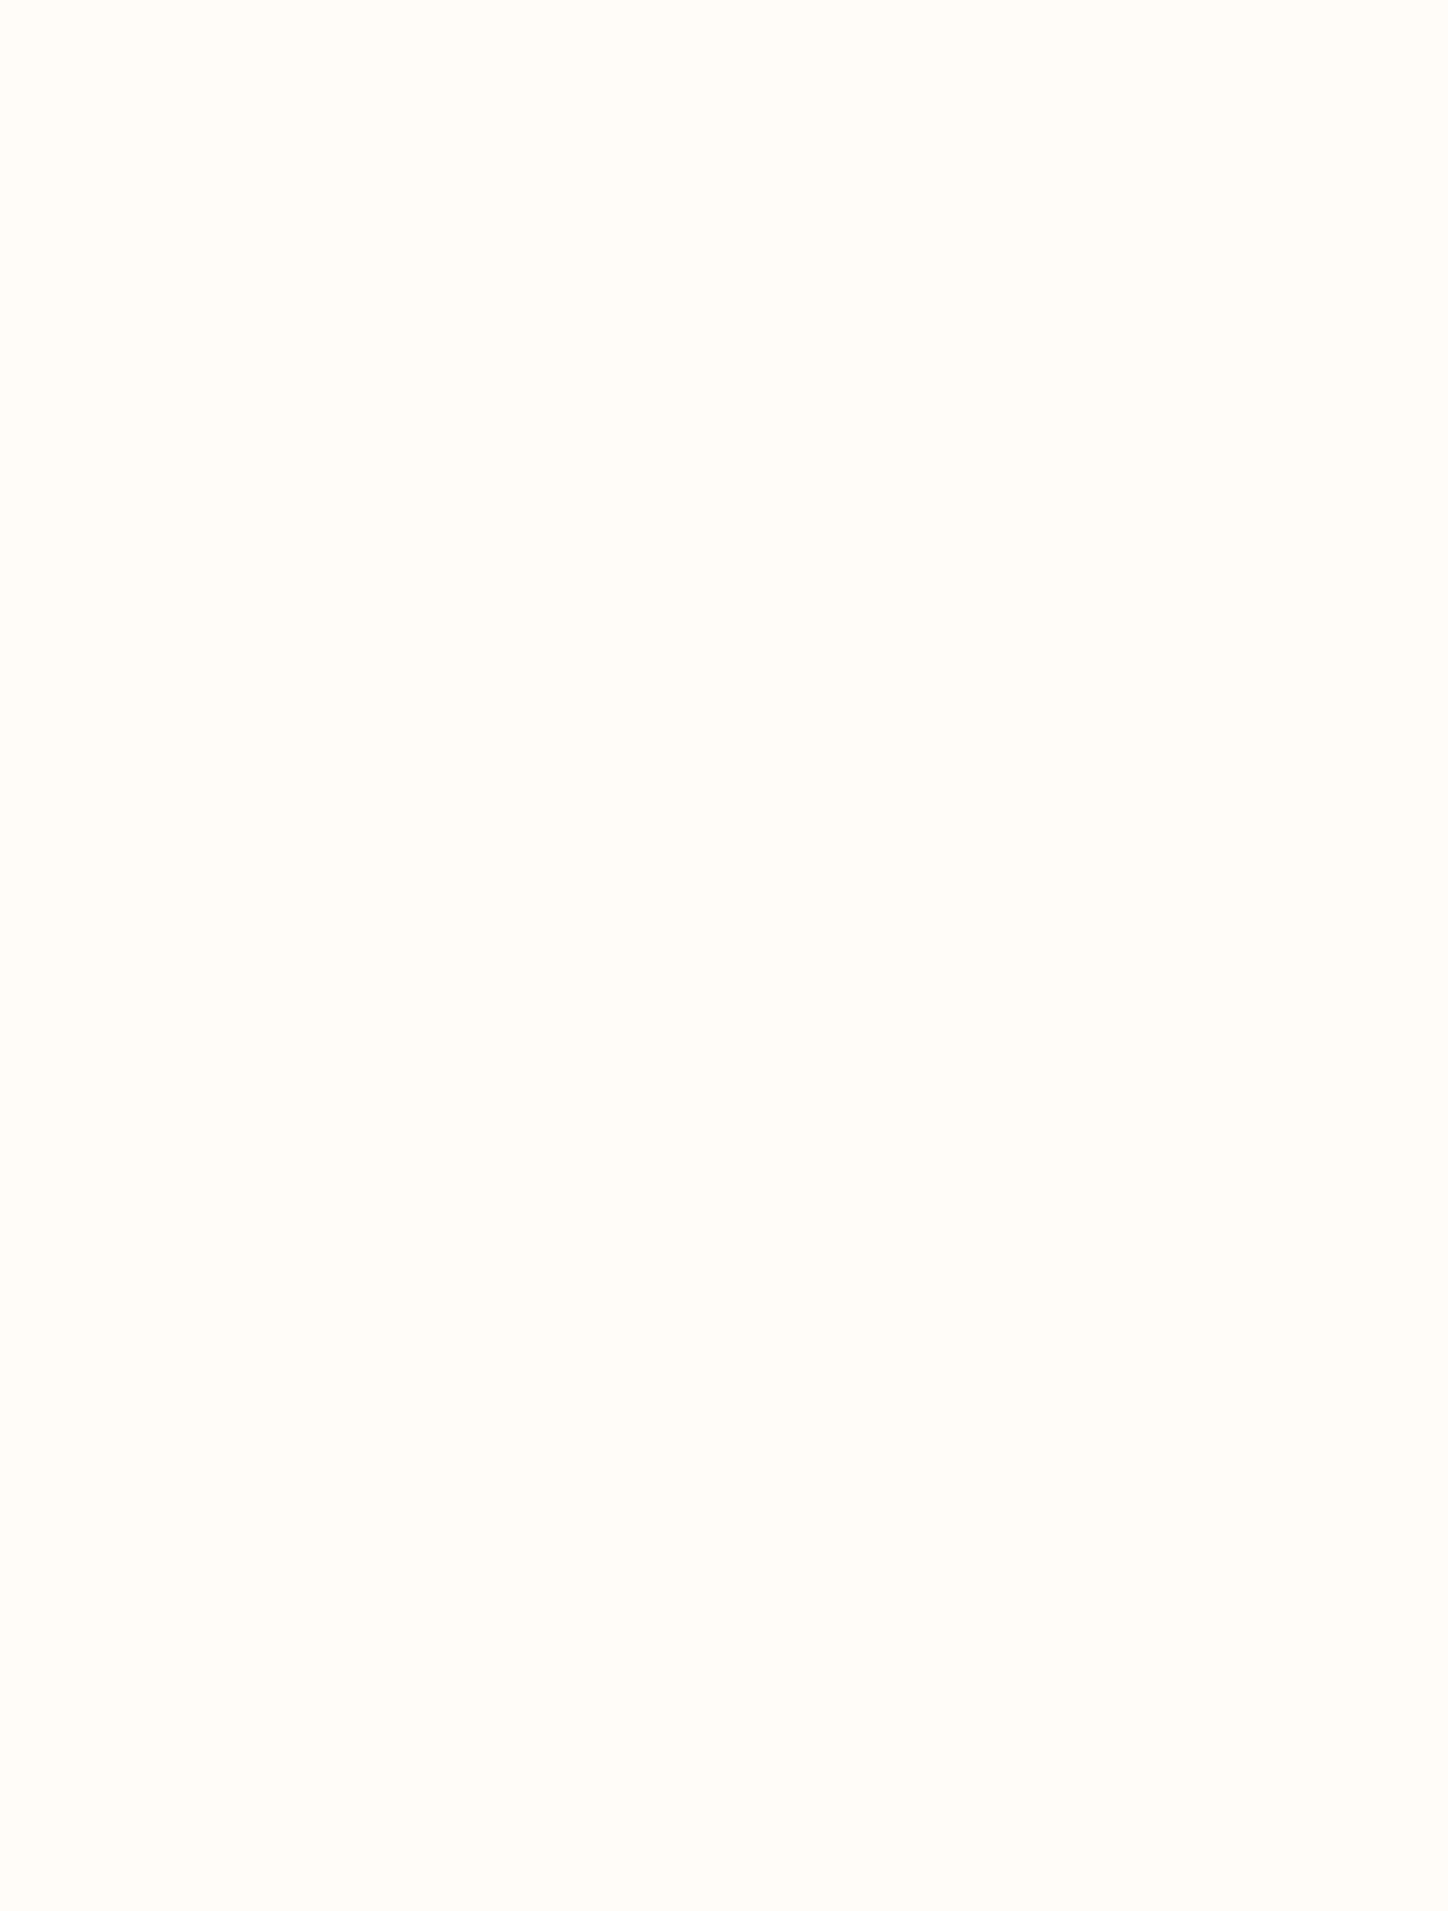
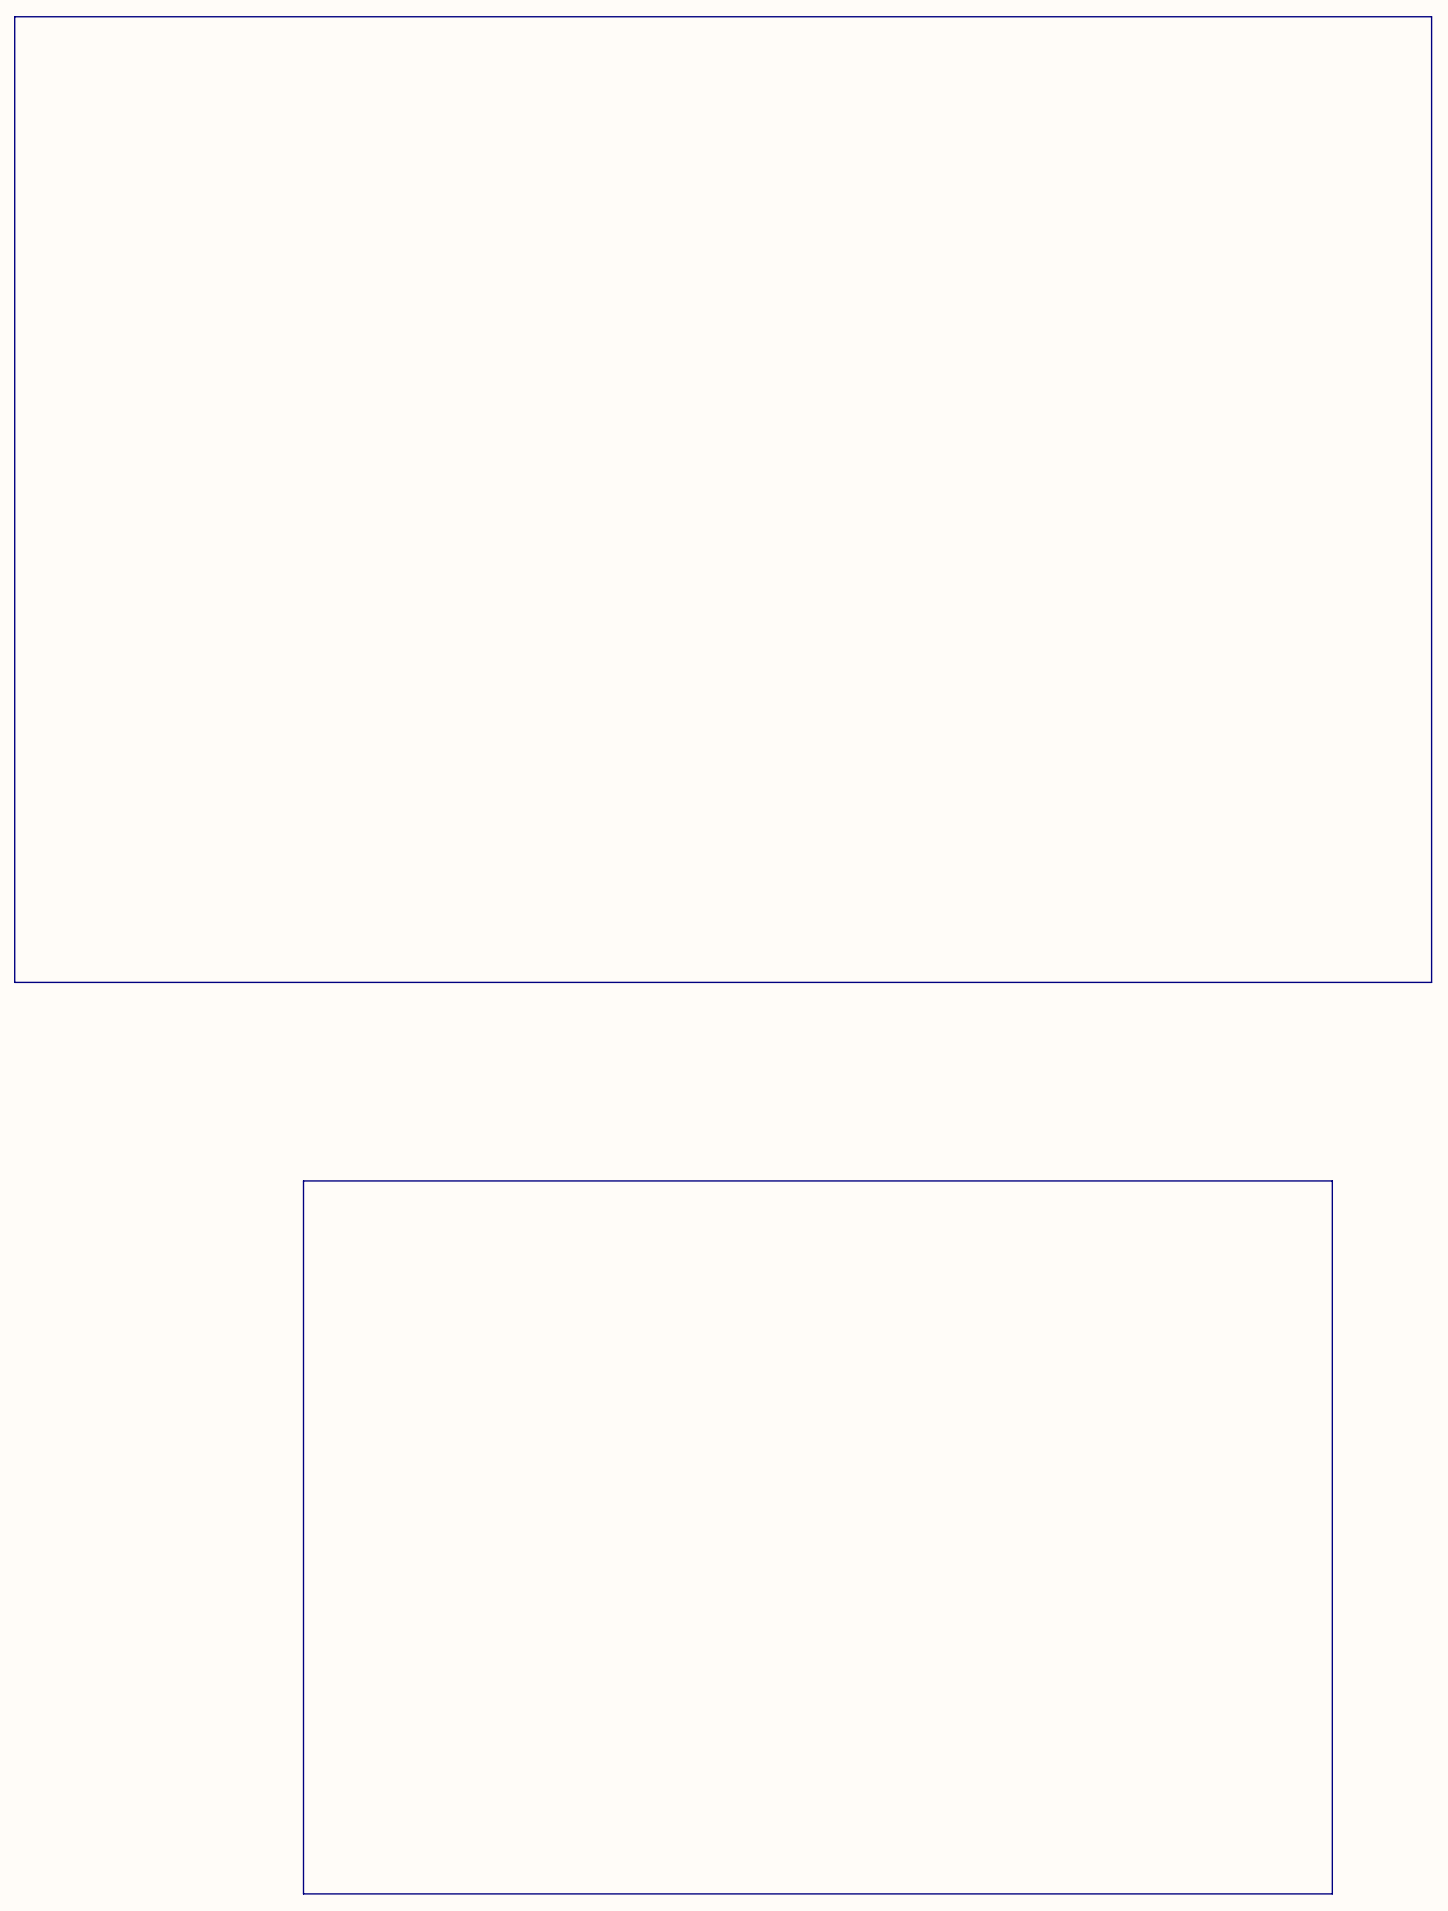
line: none -> (14, 16) (1431, 16) (1431, 982) (14, 982) (14, 16)
line: none -> (303, 1180) (303, 1893) (1332, 1893) (1332, 1180) (303, 1180)

